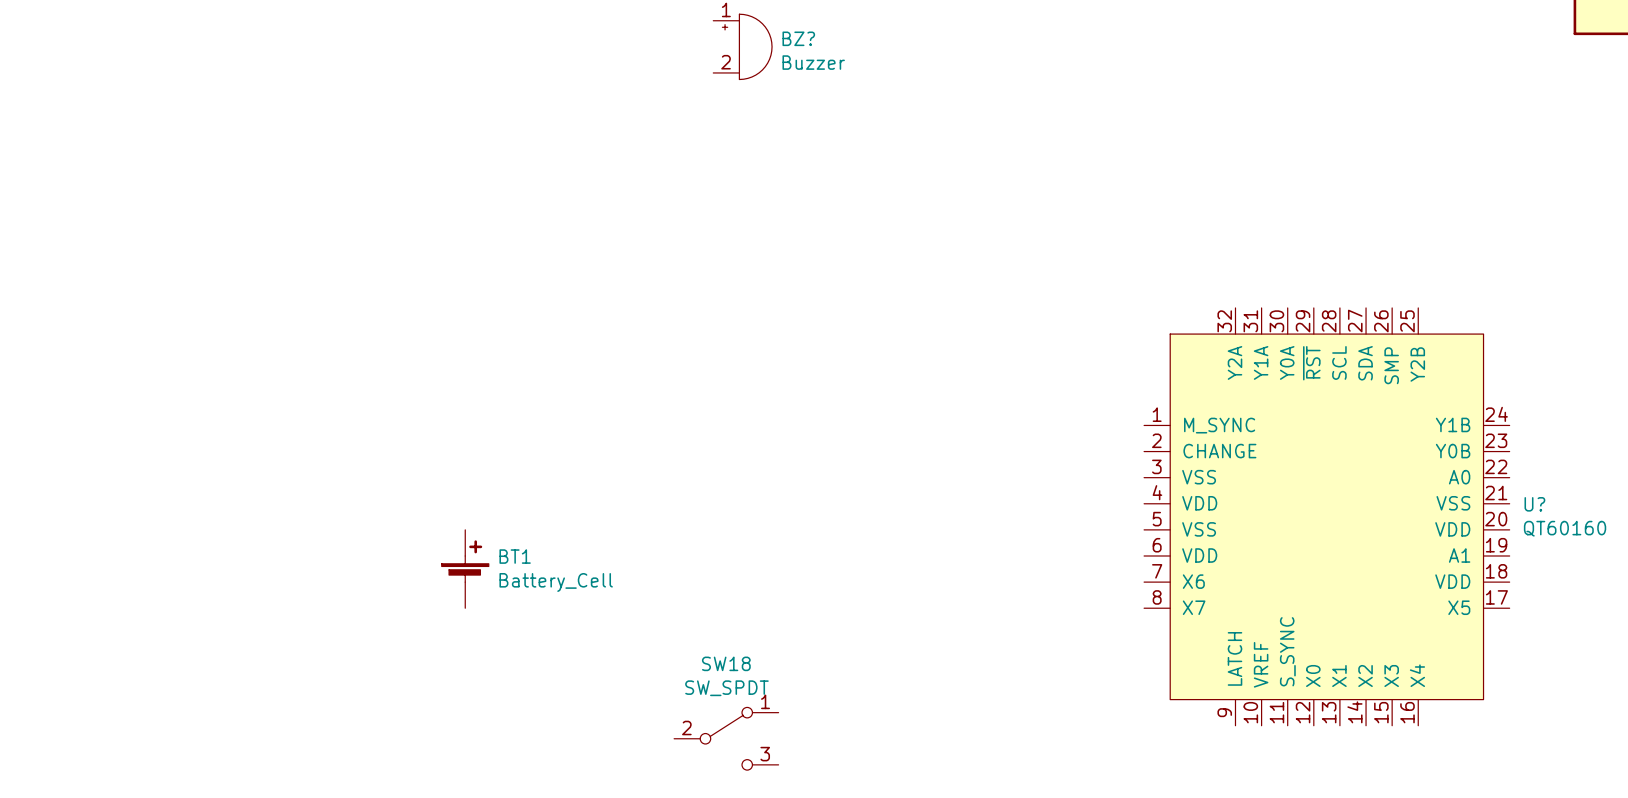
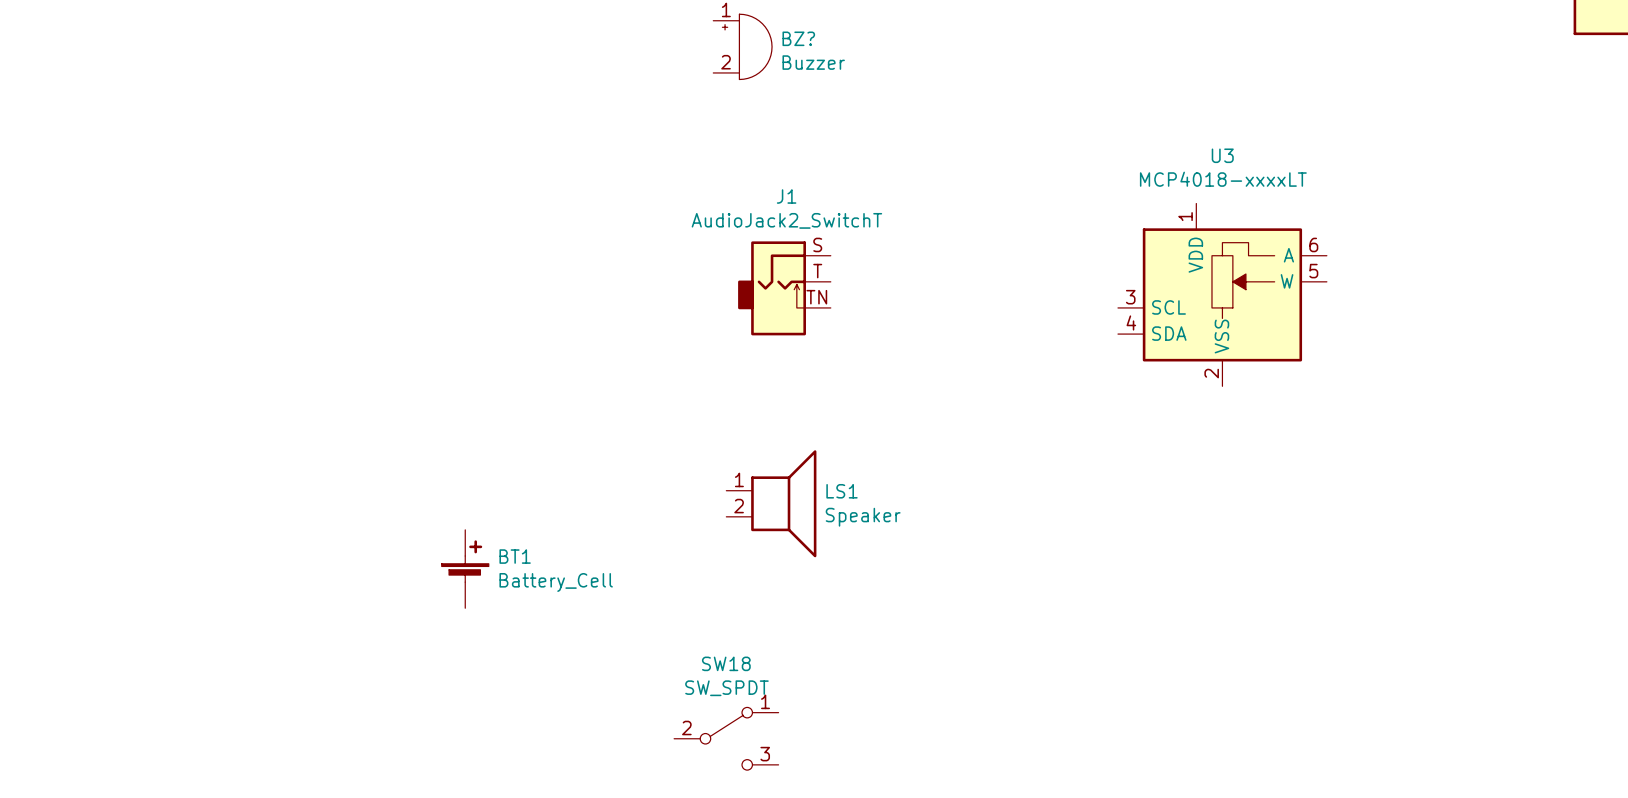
J1: none -> AudioJack2_SwitchT (784, 288)
U3: none -> MCP4018-xxxxLT (1222, 294)
LS1: none -> Speaker (771, 503)
U?: QT60160 (1326, 516) -> none

